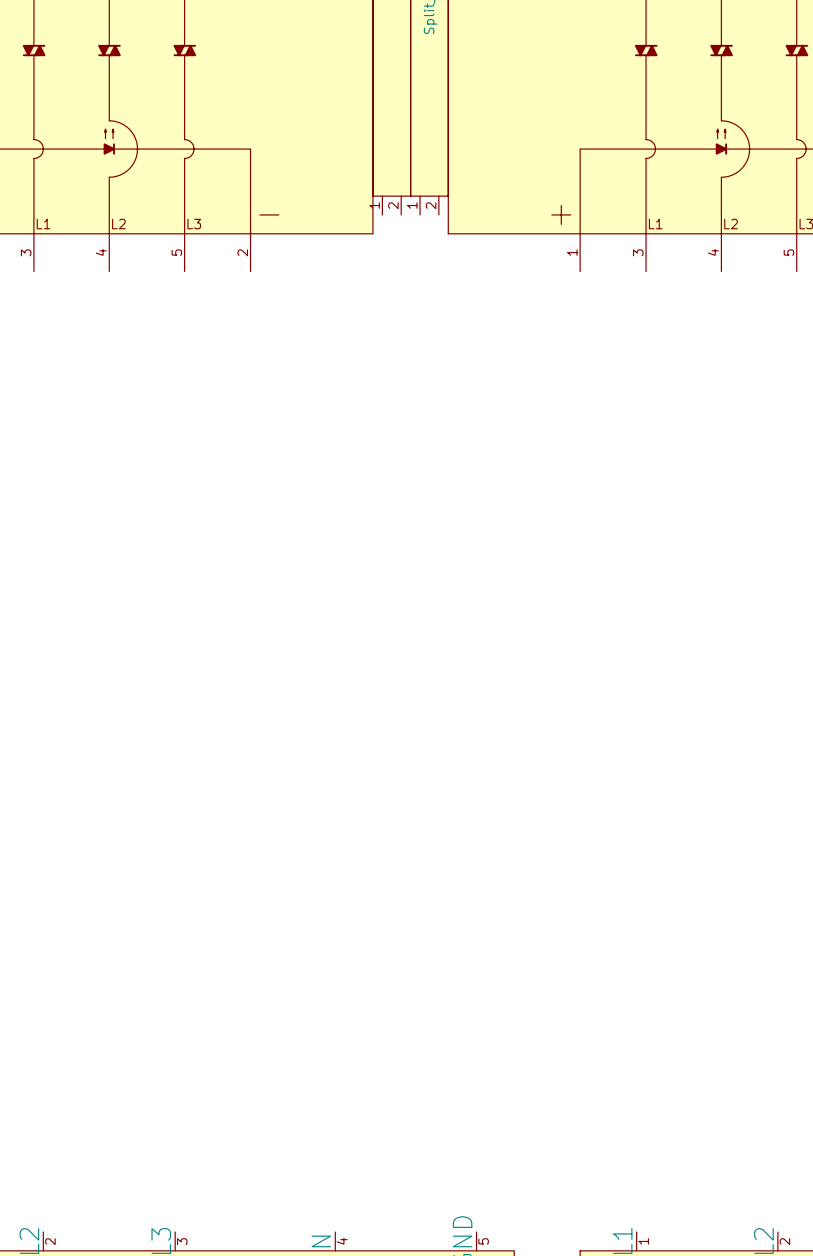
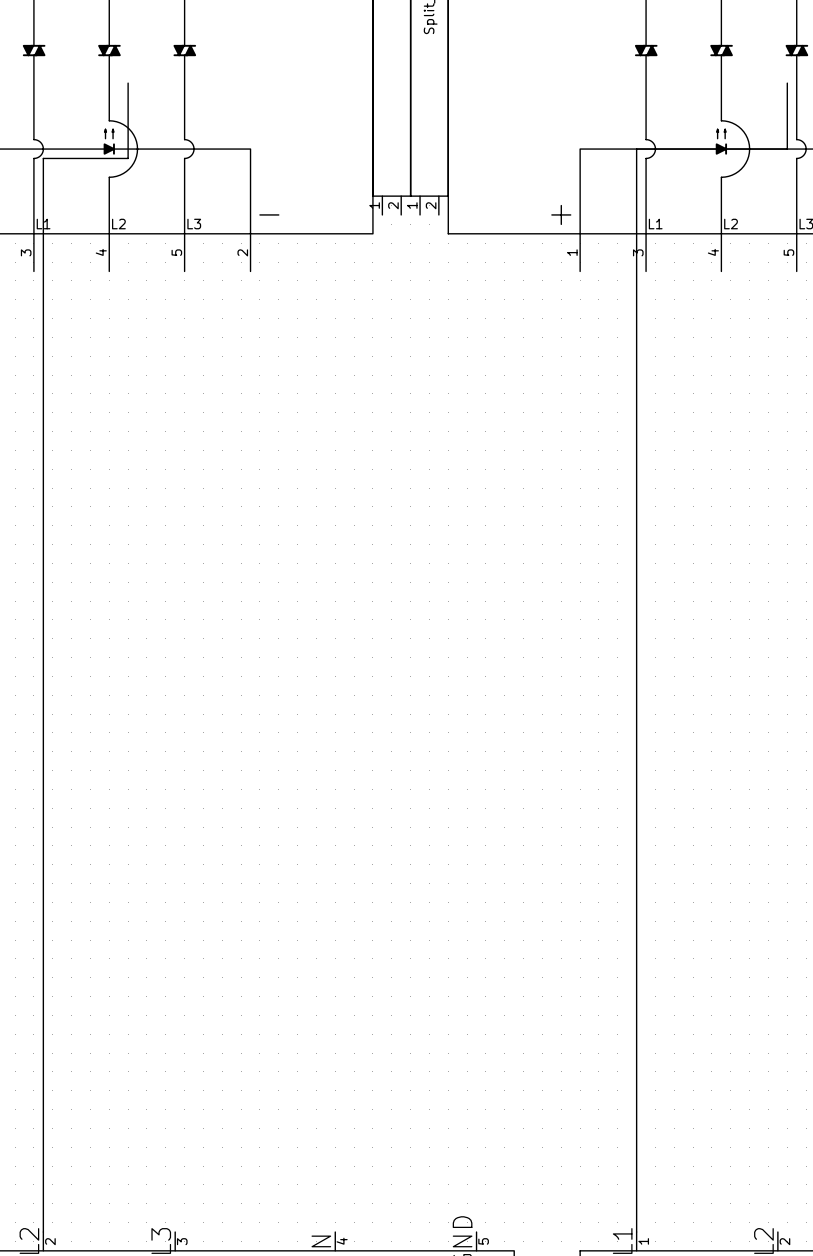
wire: none -> (128, 83) (128, 158) (43, 158) (43, 1232)
wire: none -> (787, 83) (787, 149) (636, 149) (636, 1232)

